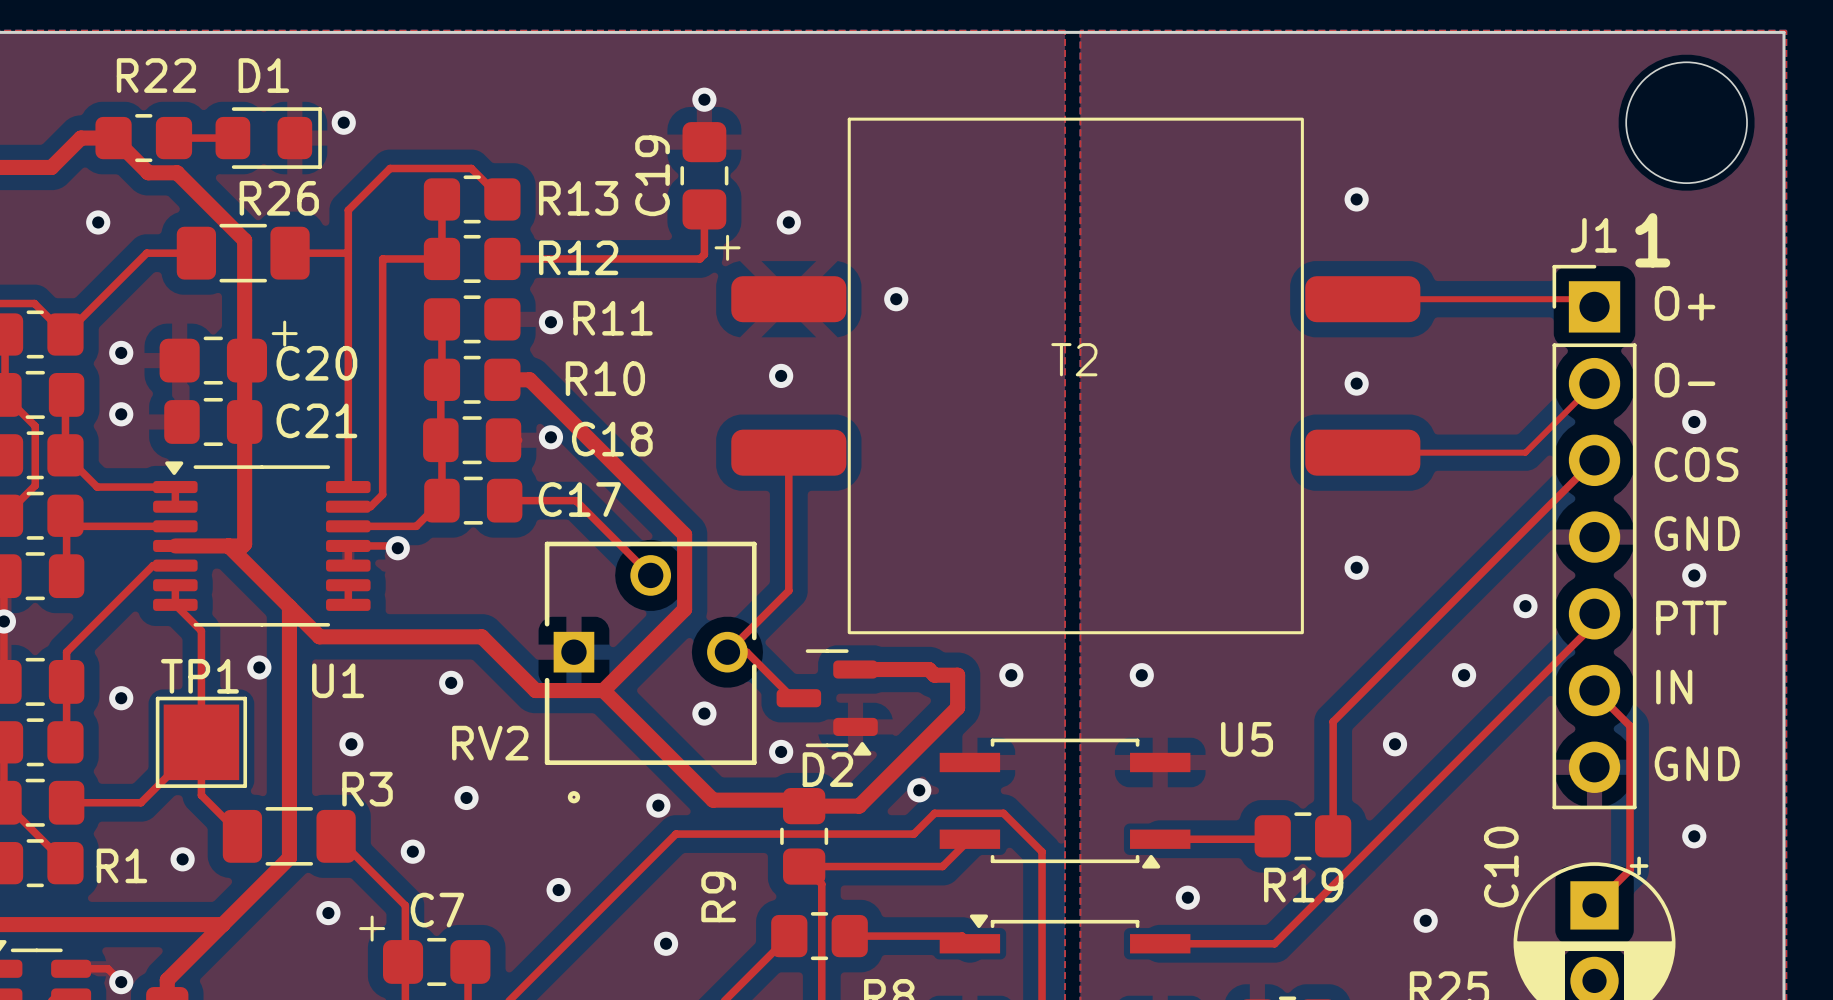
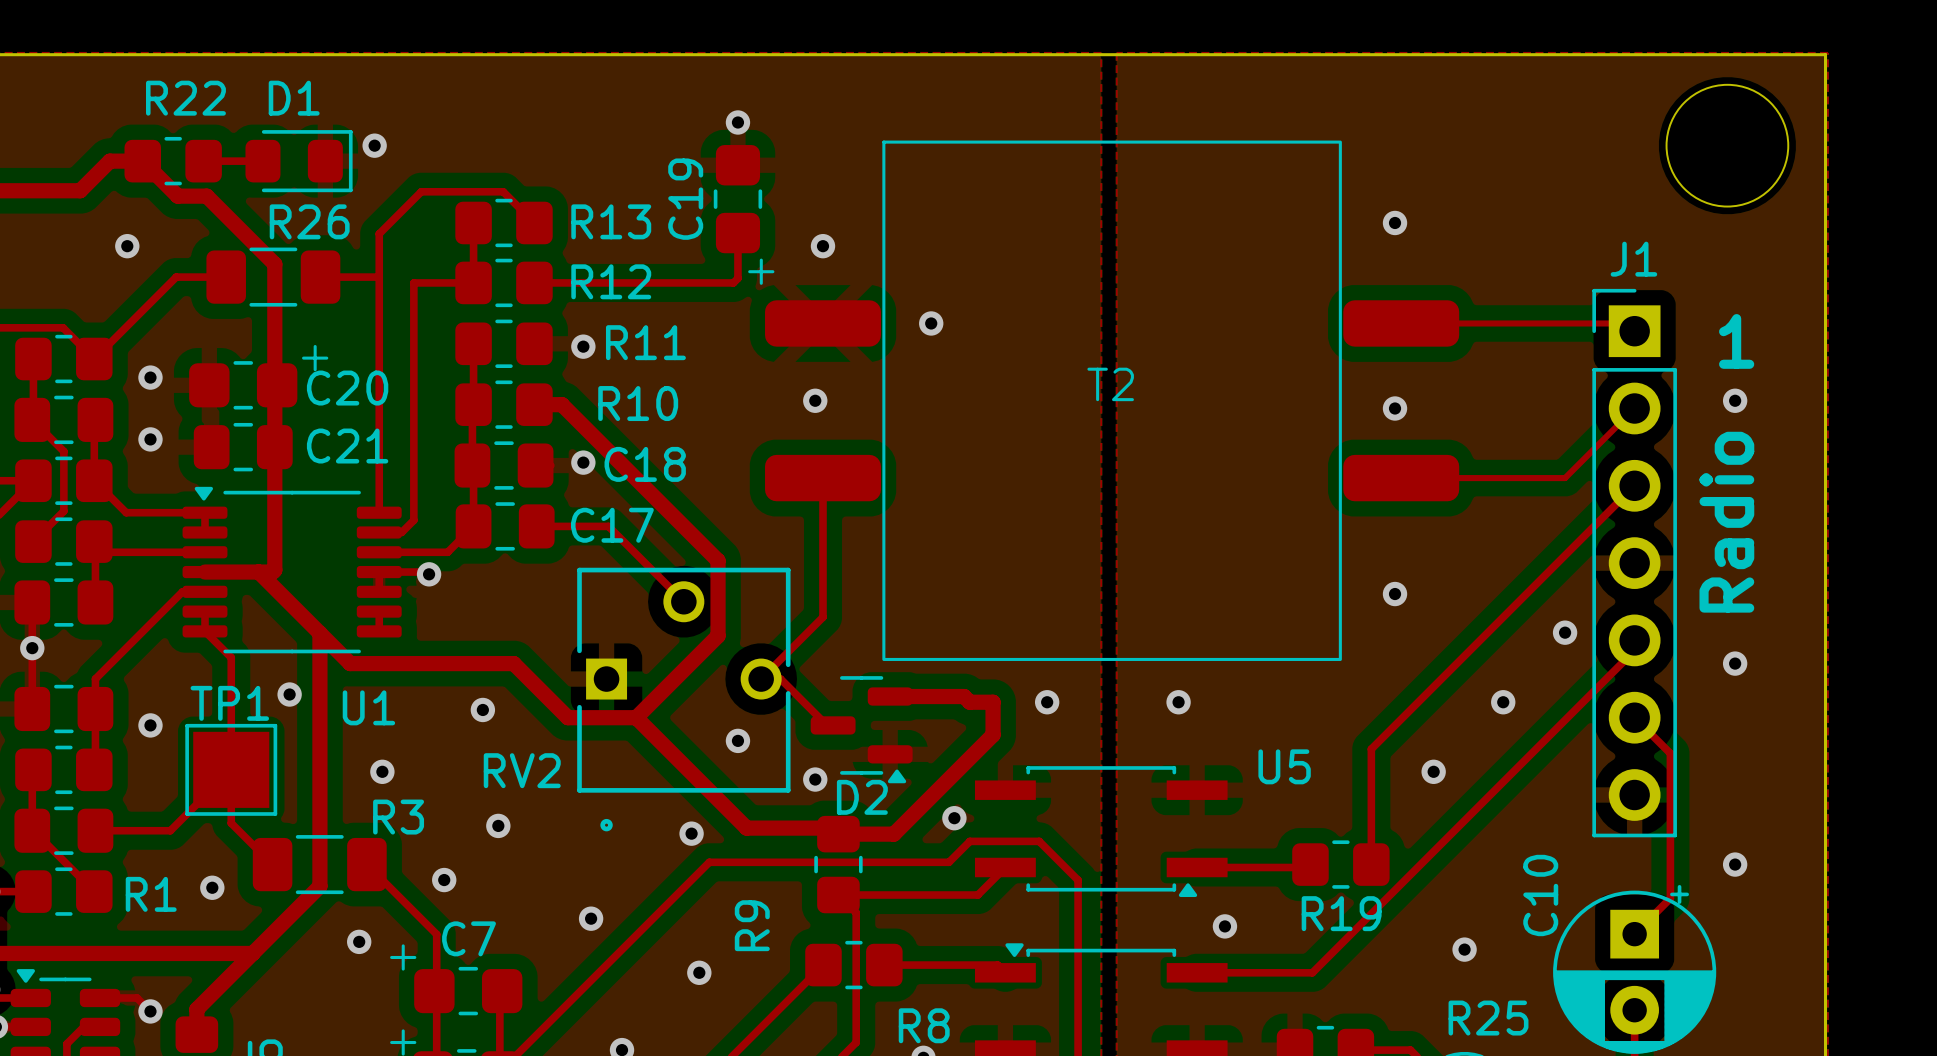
text position: 1 (1652, 240) -> 1 (1736, 341)
text: O+ (1685, 303) -> none
text: O- (1685, 380) -> none
via position: (1694, 421) -> (1735, 400)
text: COS (1696, 464) -> none
text: none -> Radio (1726, 522)
text: GND (1697, 533) -> none
via position: (1694, 575) -> (1735, 663)
text: PTT (1691, 618) -> none
text: IN (1674, 687) -> none
text: GND (1697, 763) -> none

